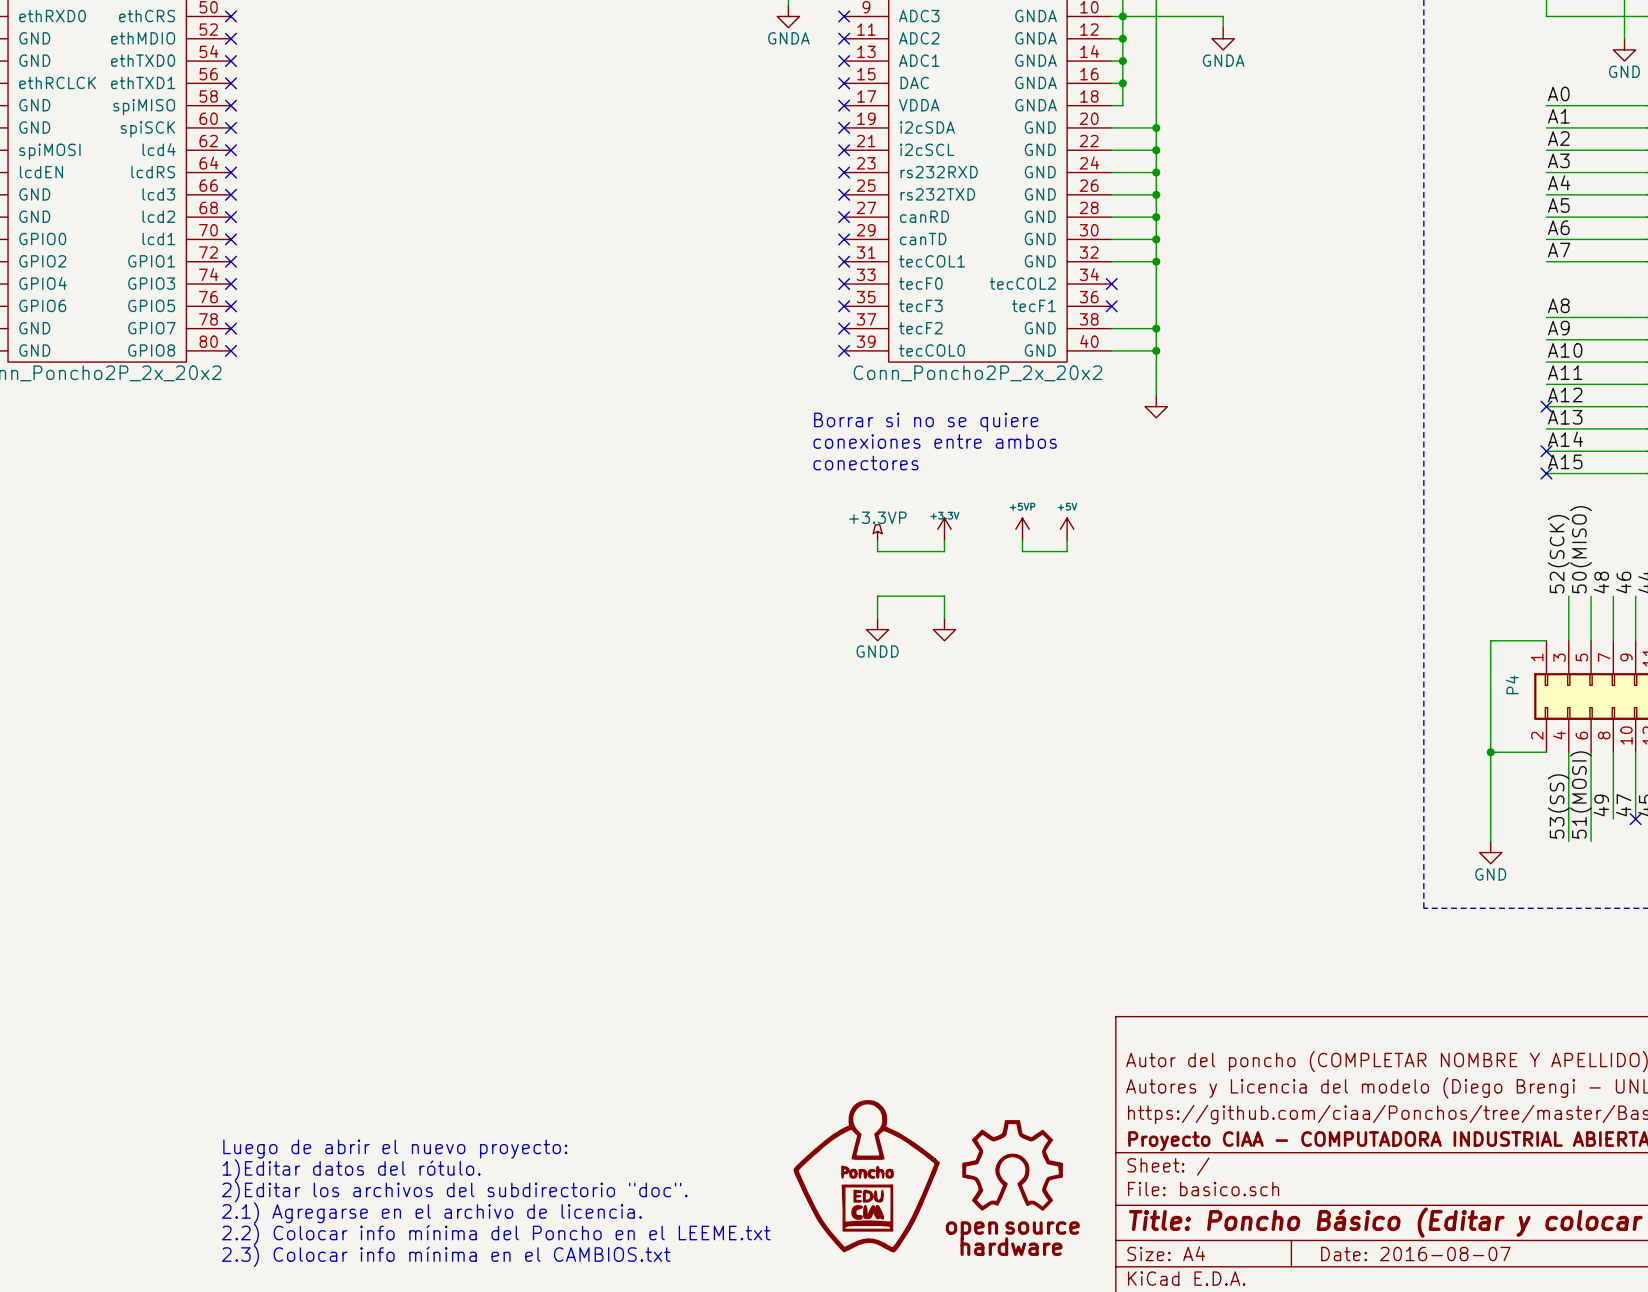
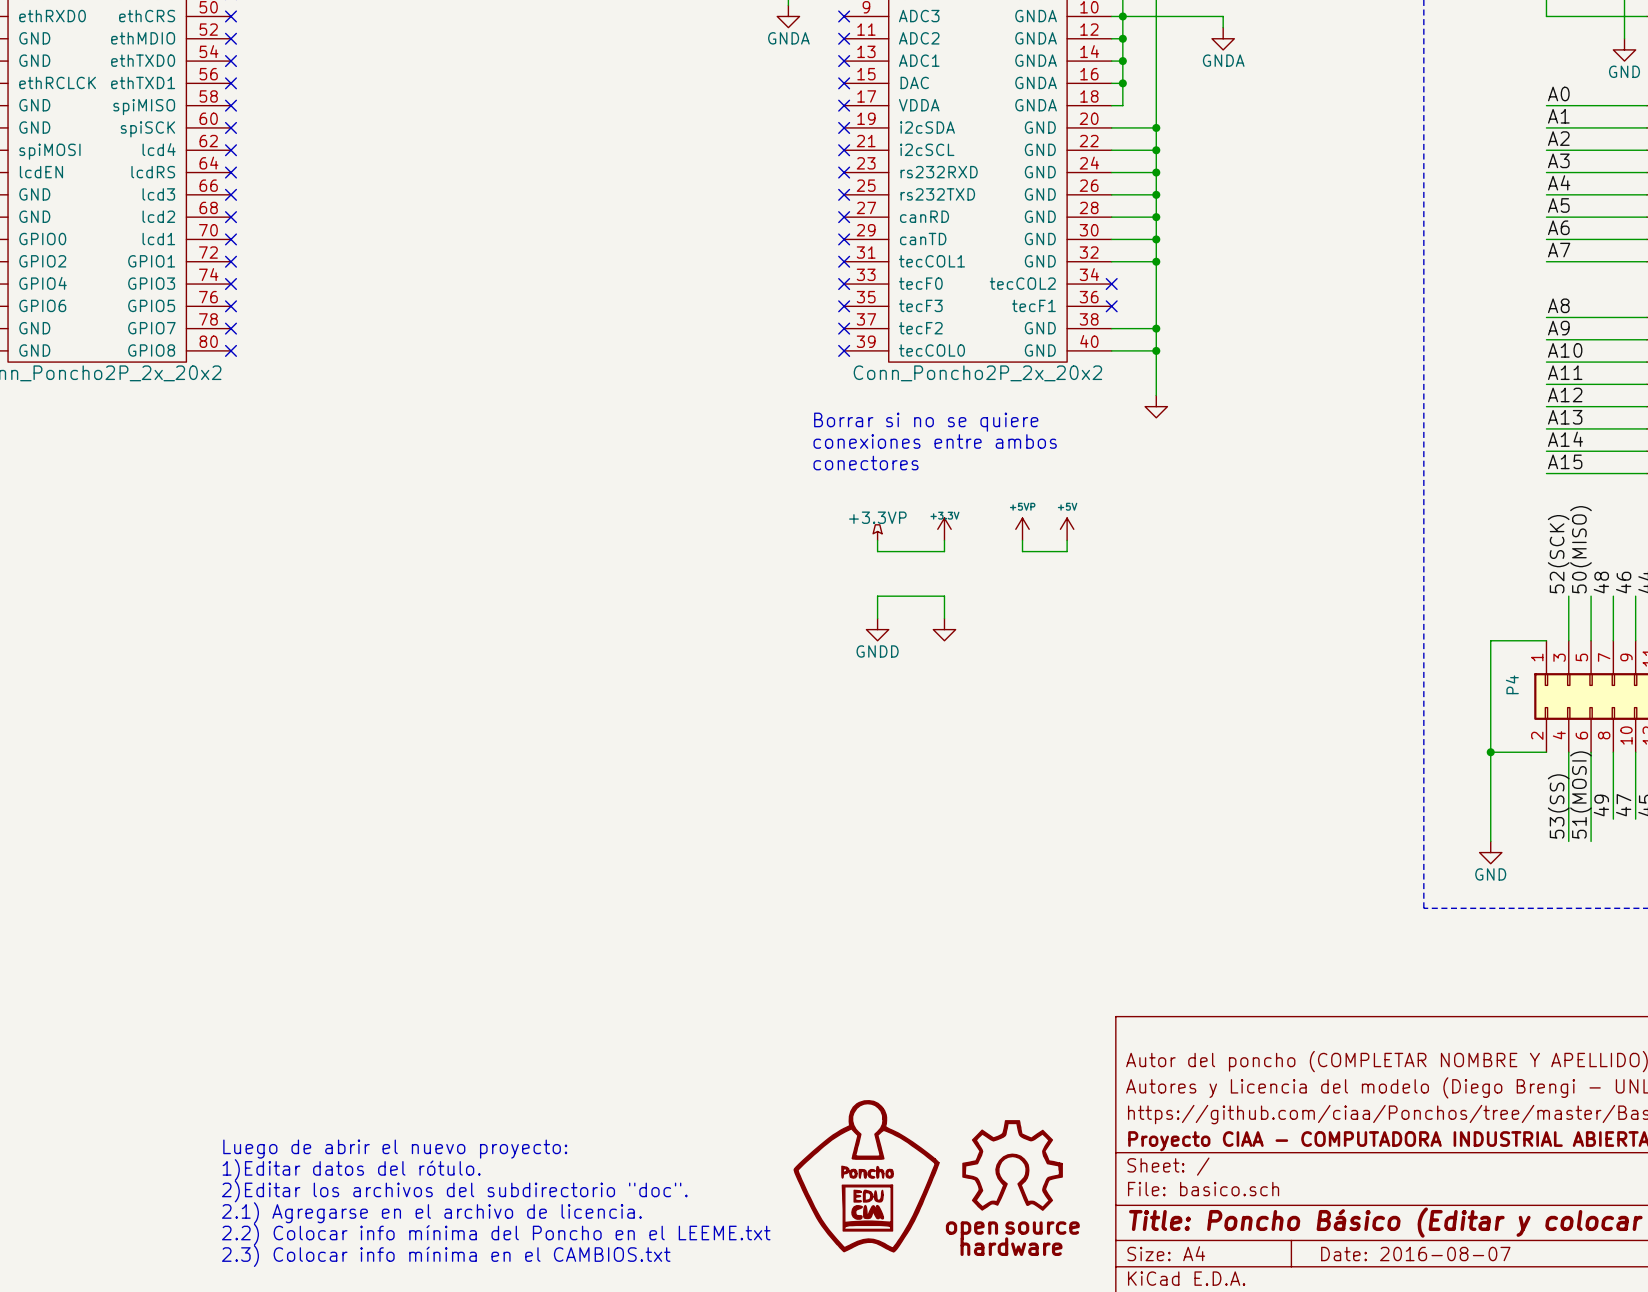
no-connect mark: (1546, 406) -> none
no-connect mark: (1546, 451) -> none
no-connect mark: (1546, 473) -> none
no-connect mark: (1635, 819) -> none

